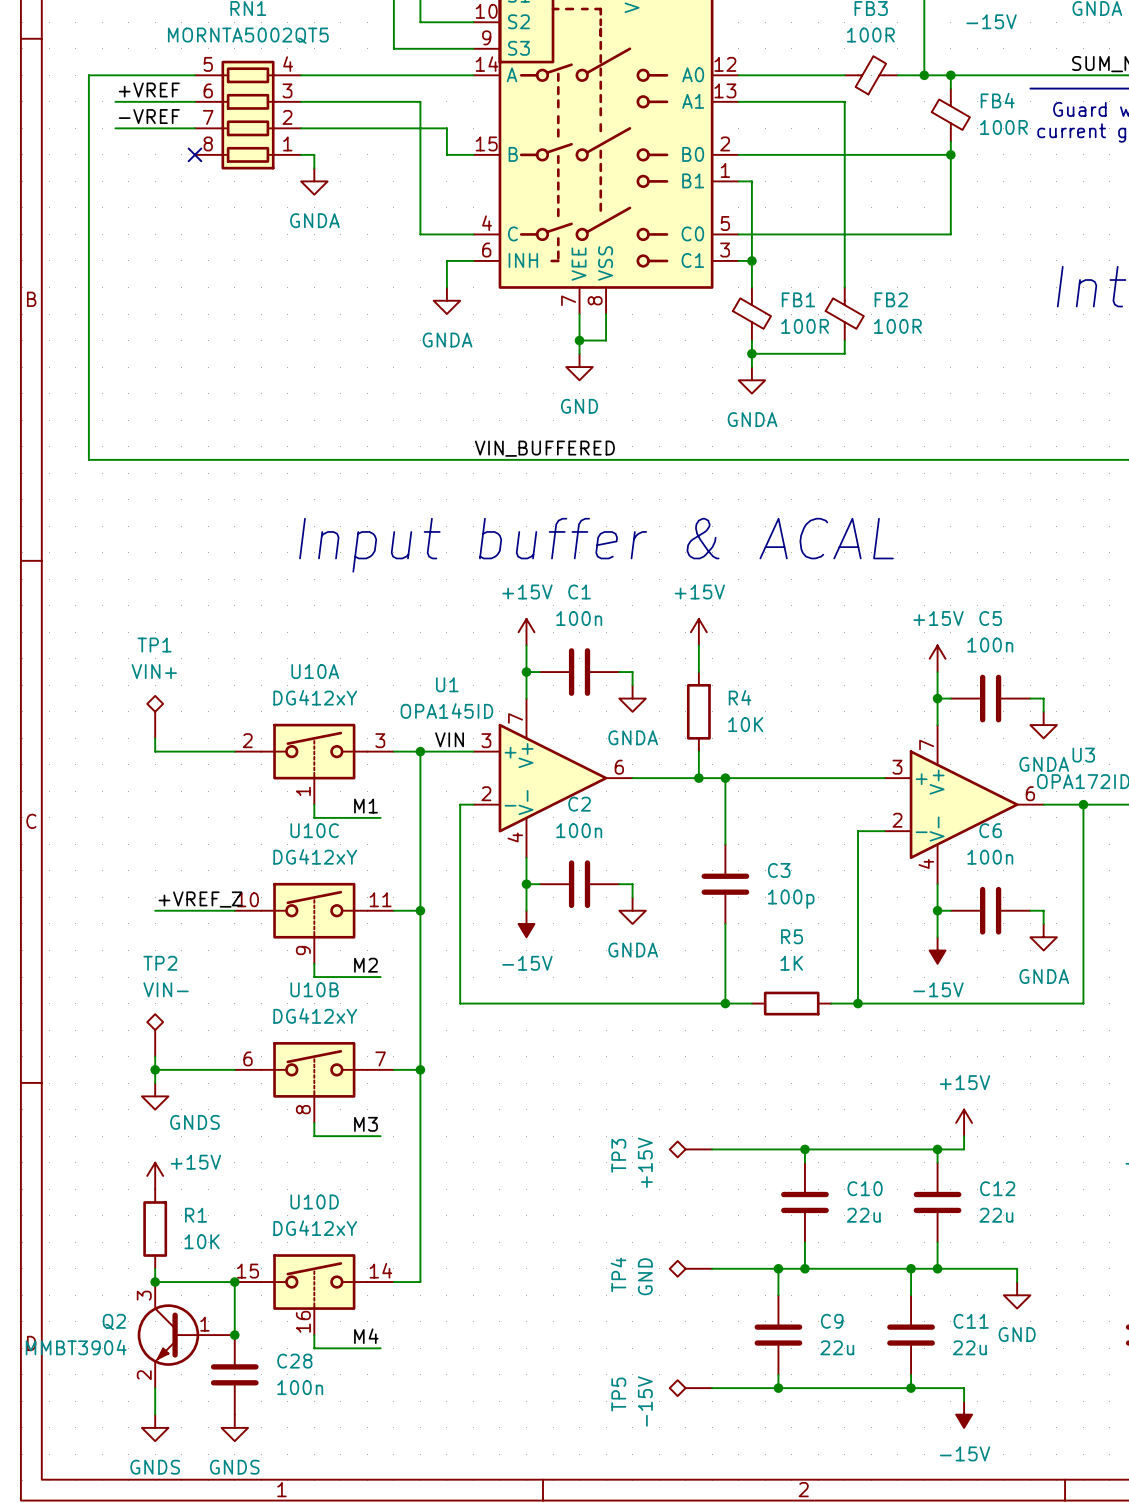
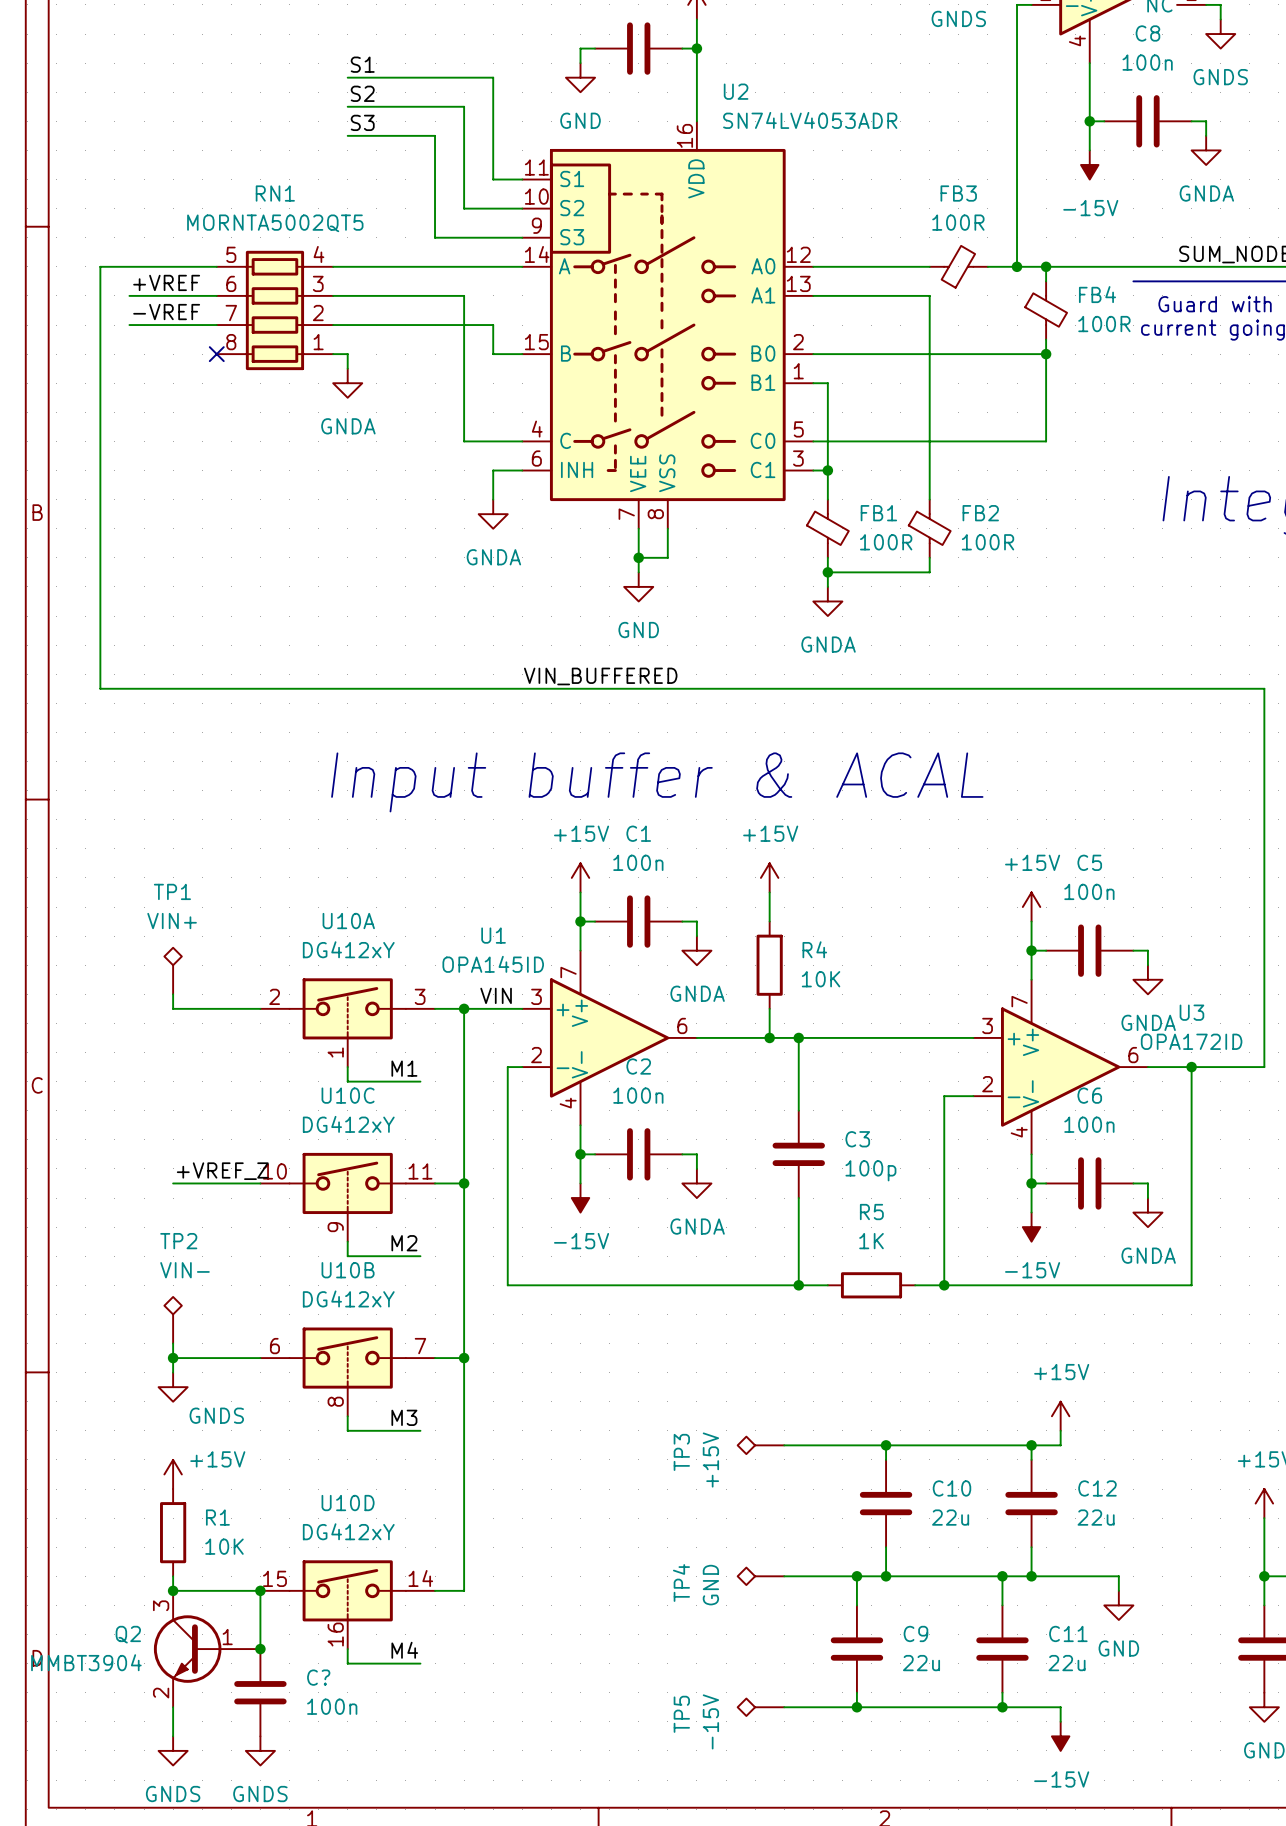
C28 name: C28 (294, 1361) -> C? (318, 1677)

